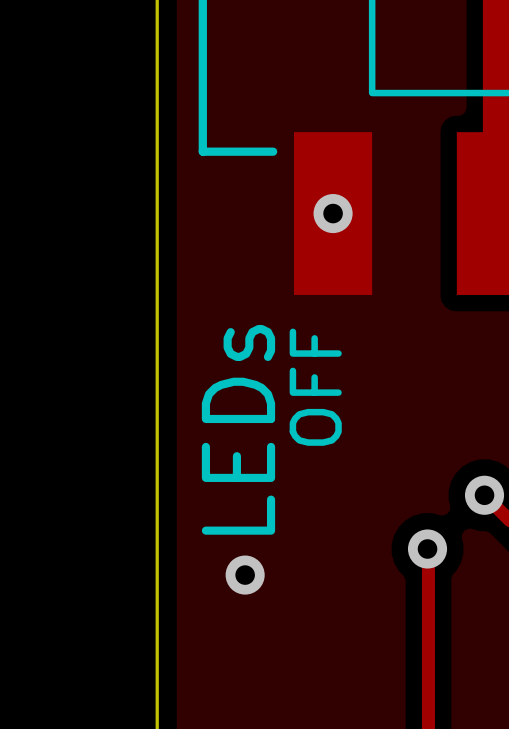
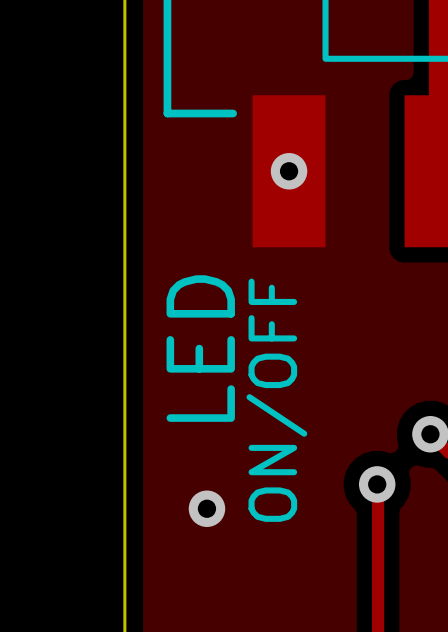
text: OFF (315, 387) -> ON/OFF (276, 400)
text: LEDs (238, 429) -> LED (200, 348)

